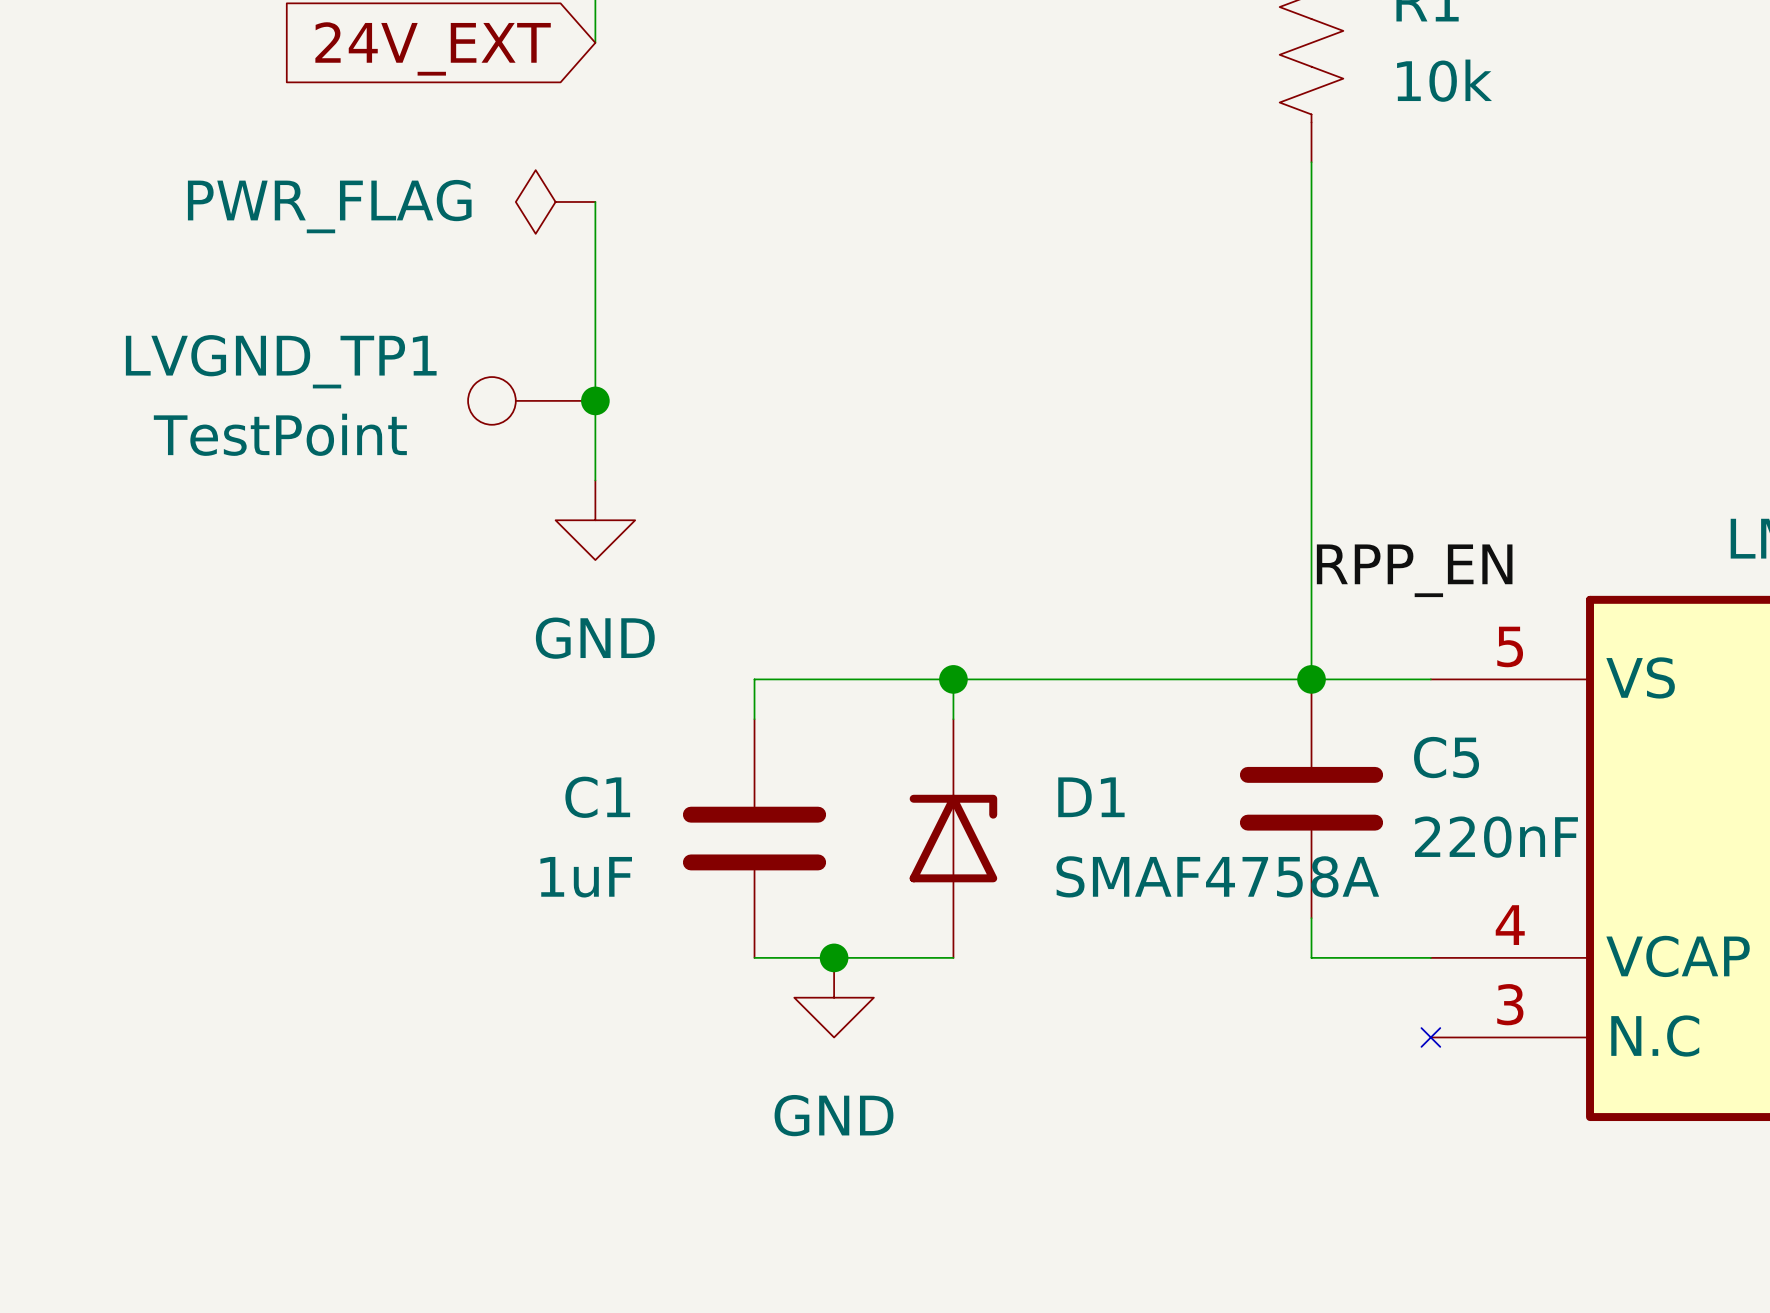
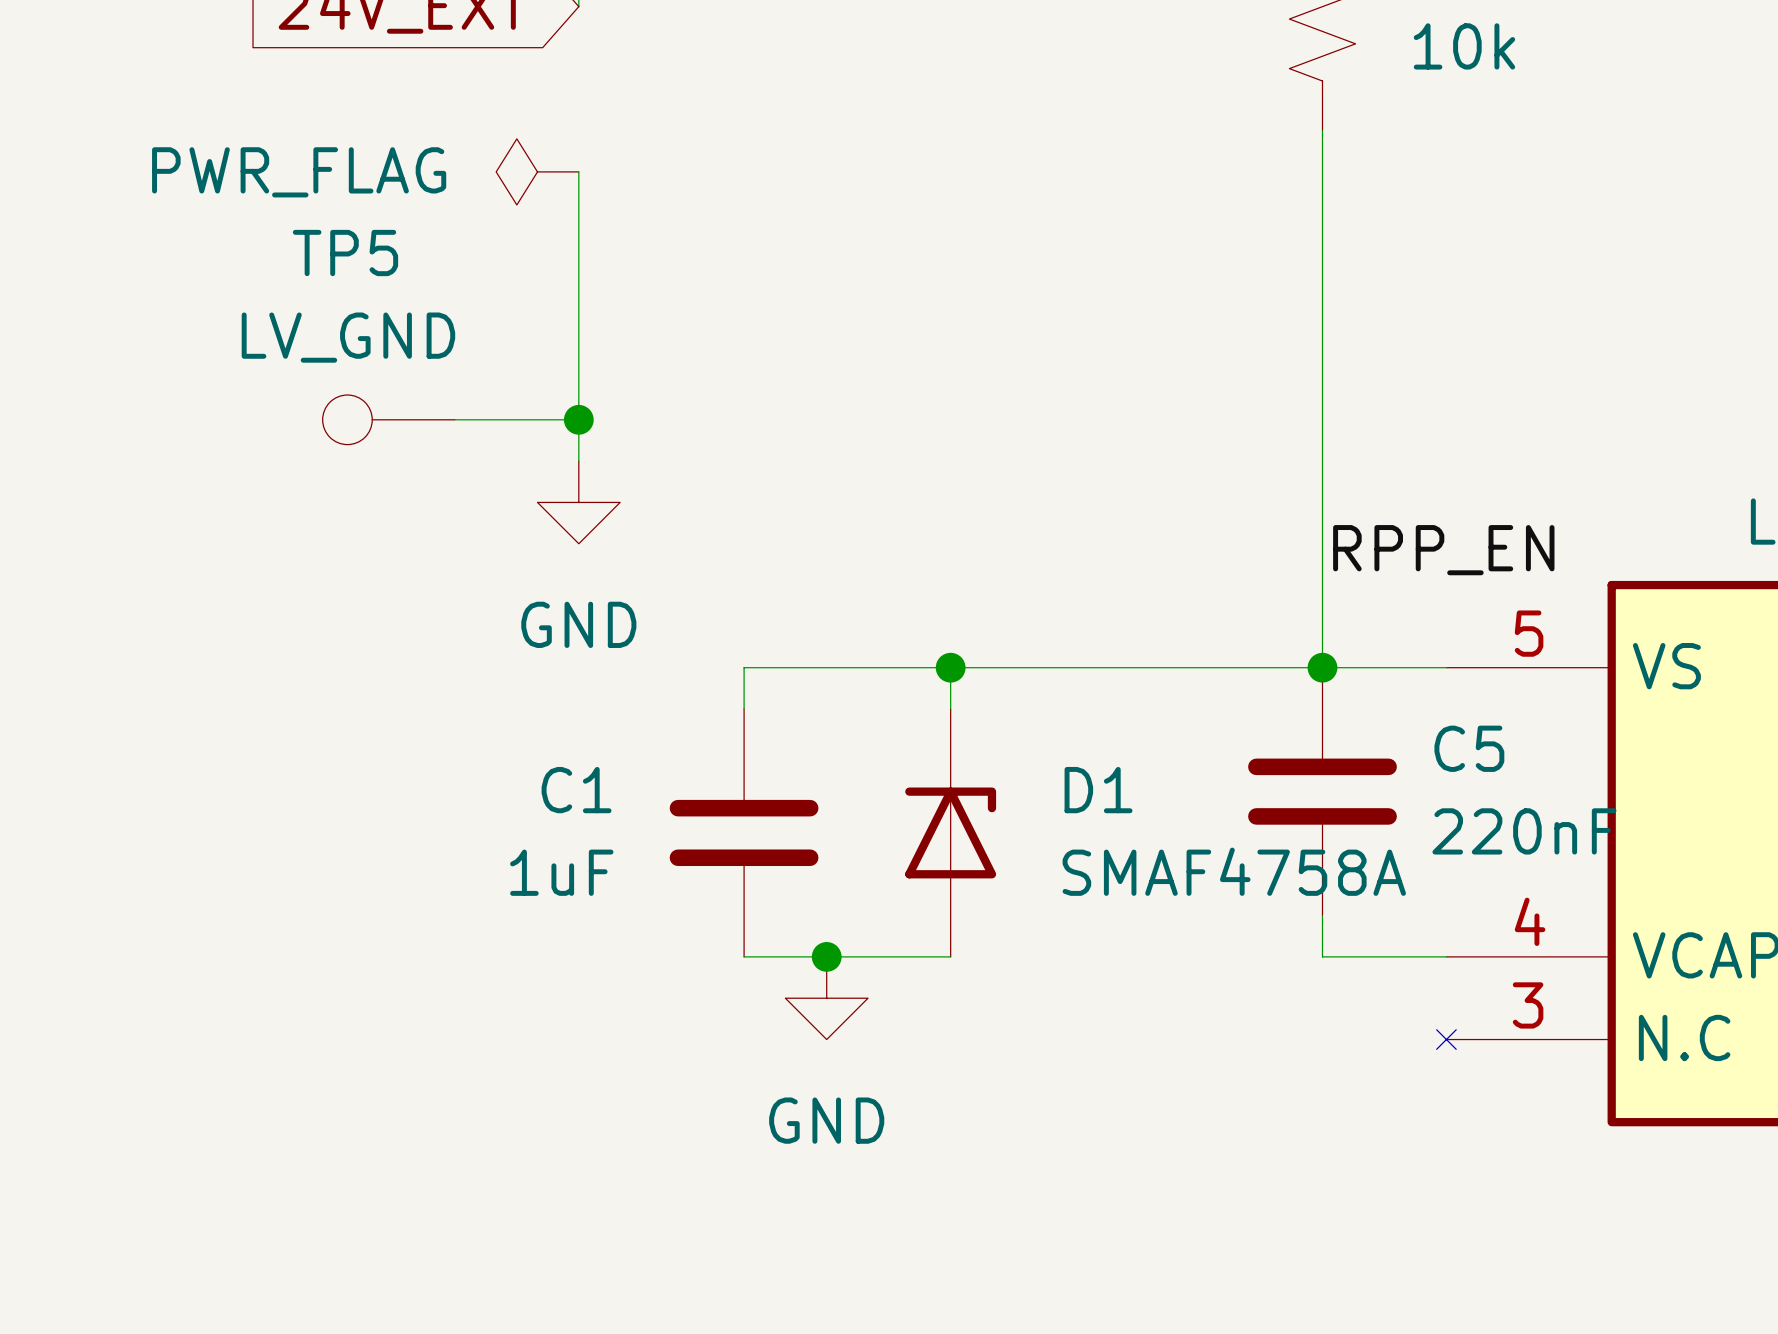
LVGND_TP1: TestPoint (531, 400) -> none
junction position: (595, 400) -> (578, 419)
TP5: none -> LV_GND (388, 419)
wire: none -> (454, 419) (578, 419)

